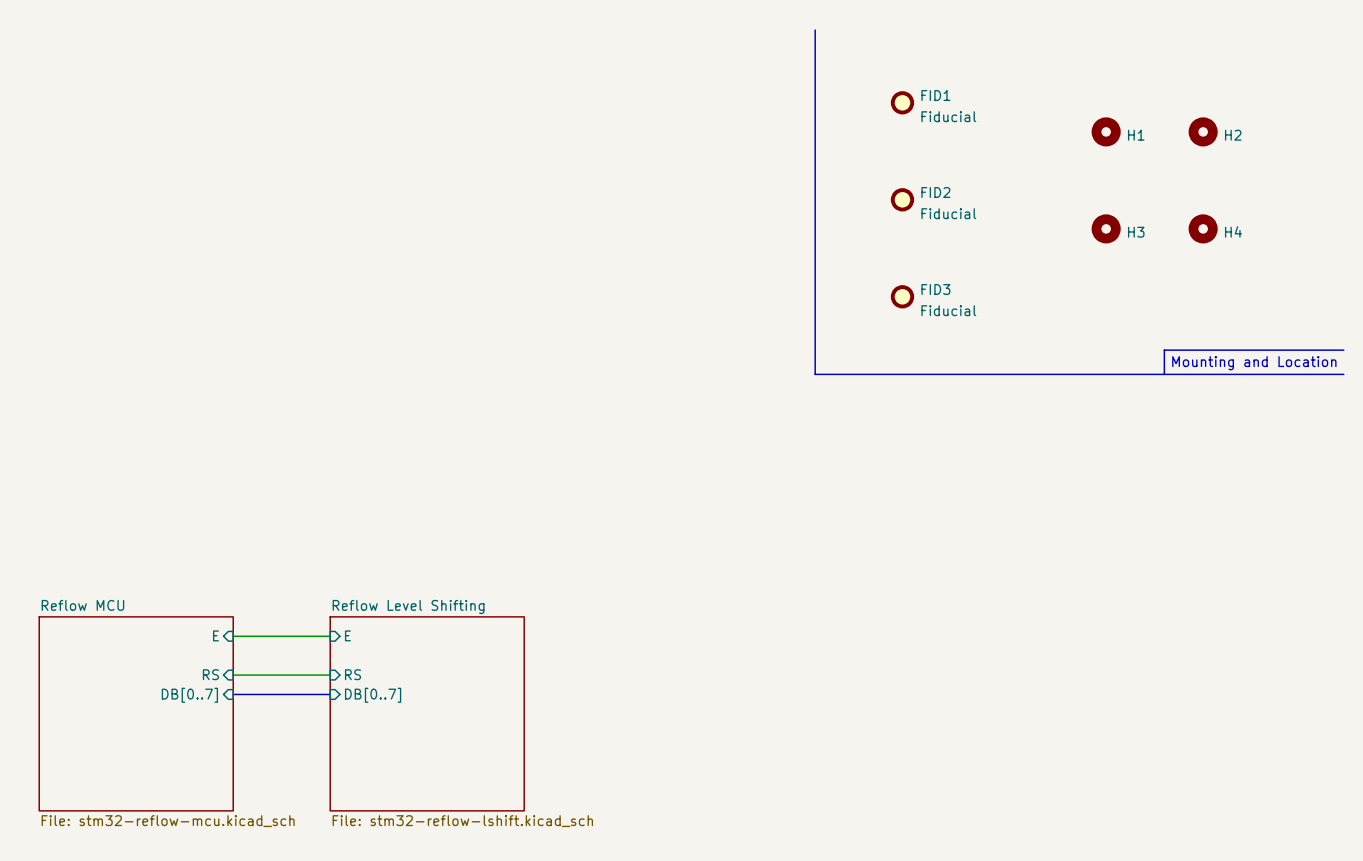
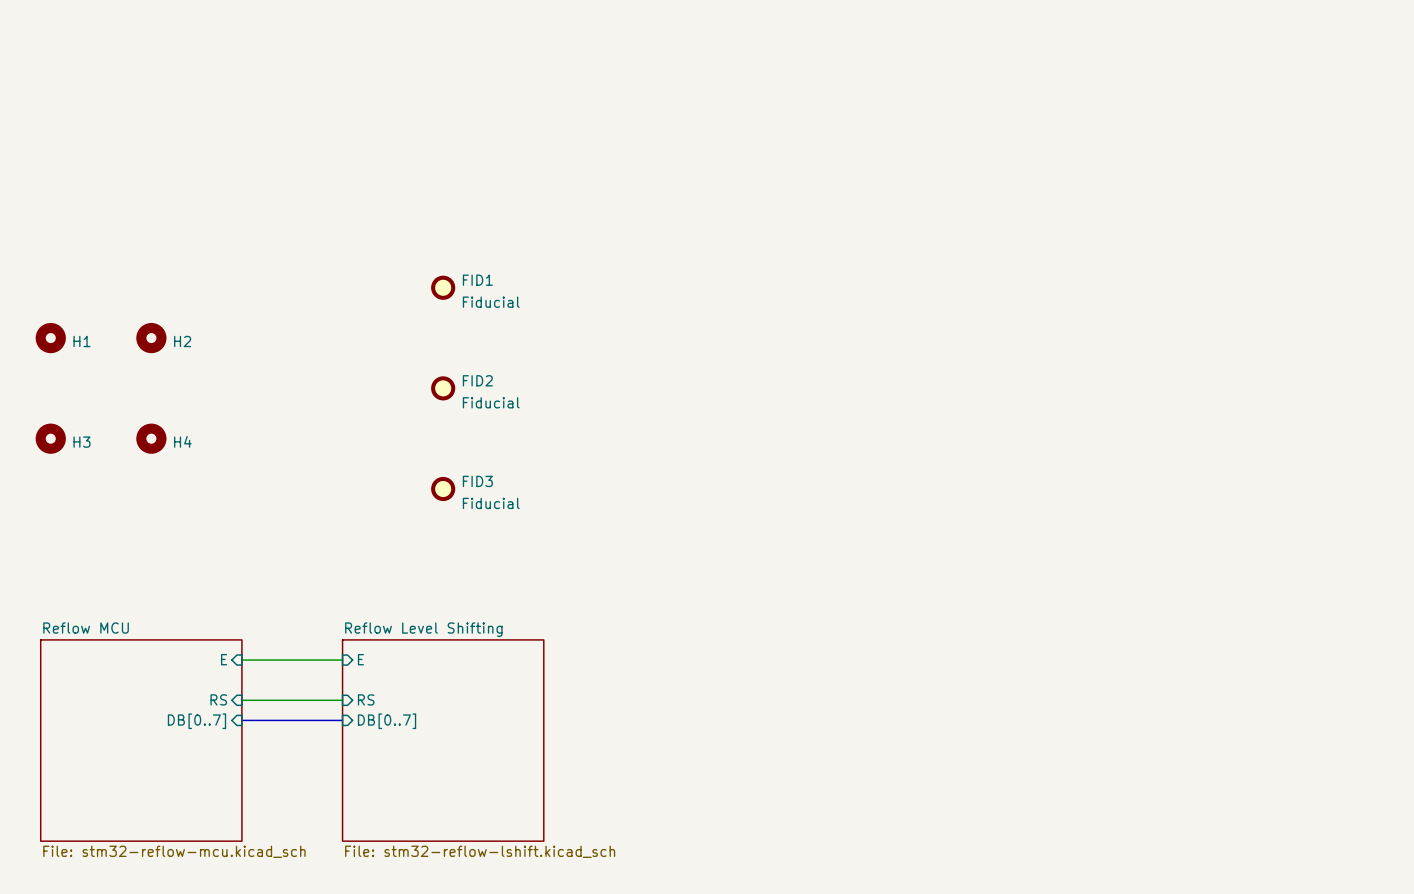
line: (815, 30) (815, 374) (1343, 374) -> none
FID1 position: (902, 102) -> (443, 287)
H1 position: (1106, 131) -> (50, 338)
H2 position: (1203, 131) -> (151, 338)
FID2 position: (902, 199) -> (443, 388)
H3 position: (1106, 228) -> (50, 438)
H4 position: (1203, 228) -> (151, 438)
FID3 position: (902, 296) -> (443, 489)
line: (1343, 350) (1164, 350) (1164, 374) -> none
text: Mounting and Location (1254, 363) -> none

